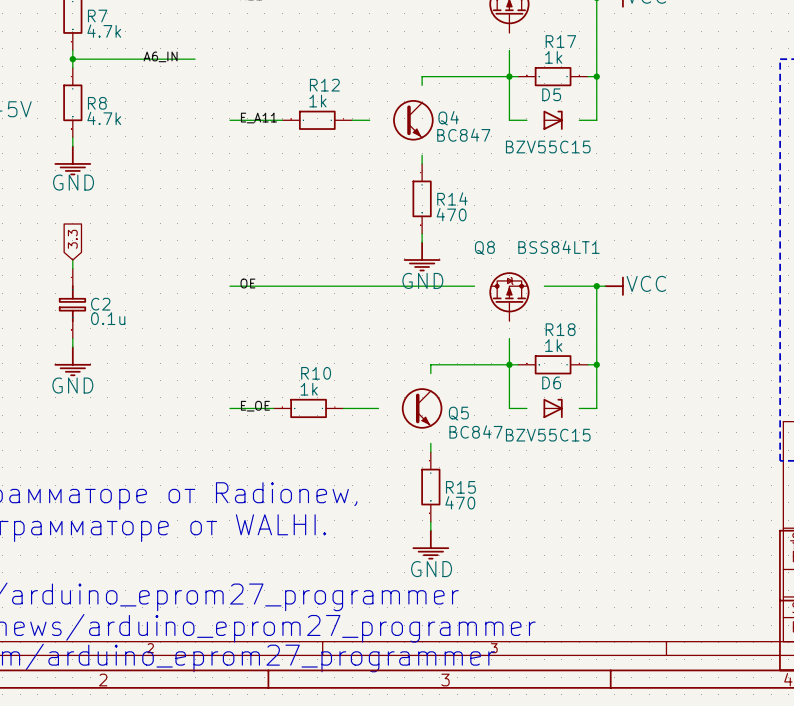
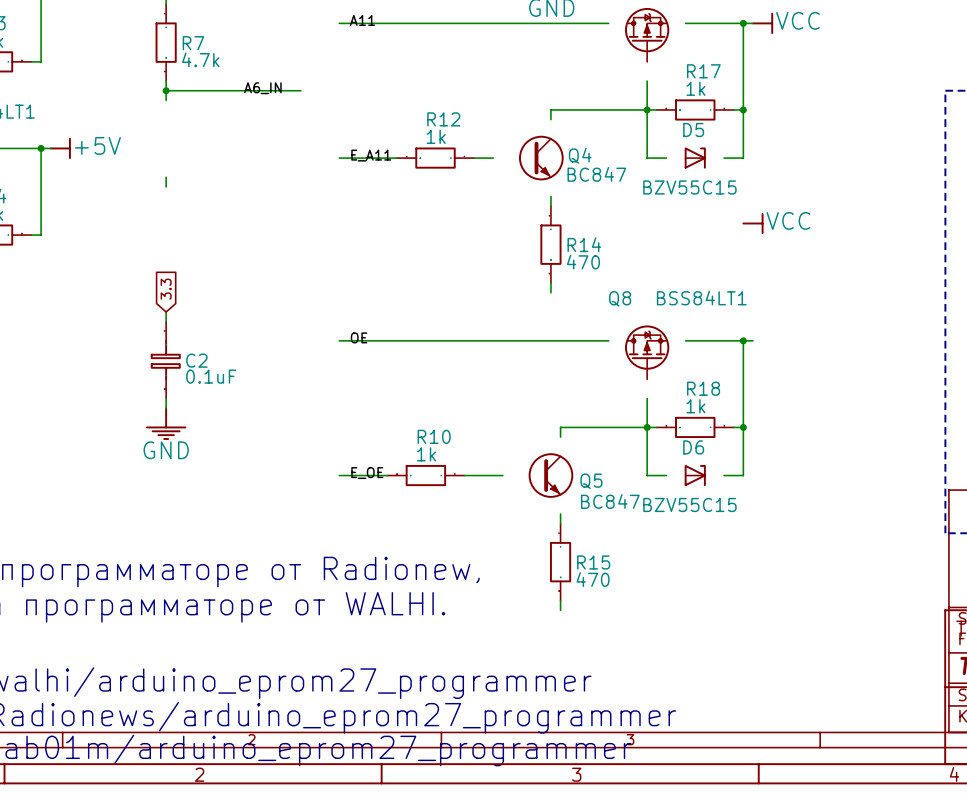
R8: 4.7k (72, 102) -> none
power symbol: GND (72, 160) -> none
power symbol: GND (422, 256) -> none
power symbol position: VCC (614, 286) -> VCC (752, 223)
C2 value: 0.1u (108, 318) -> 0.1uF (211, 376)
power symbol: GND (430, 544) -> none

